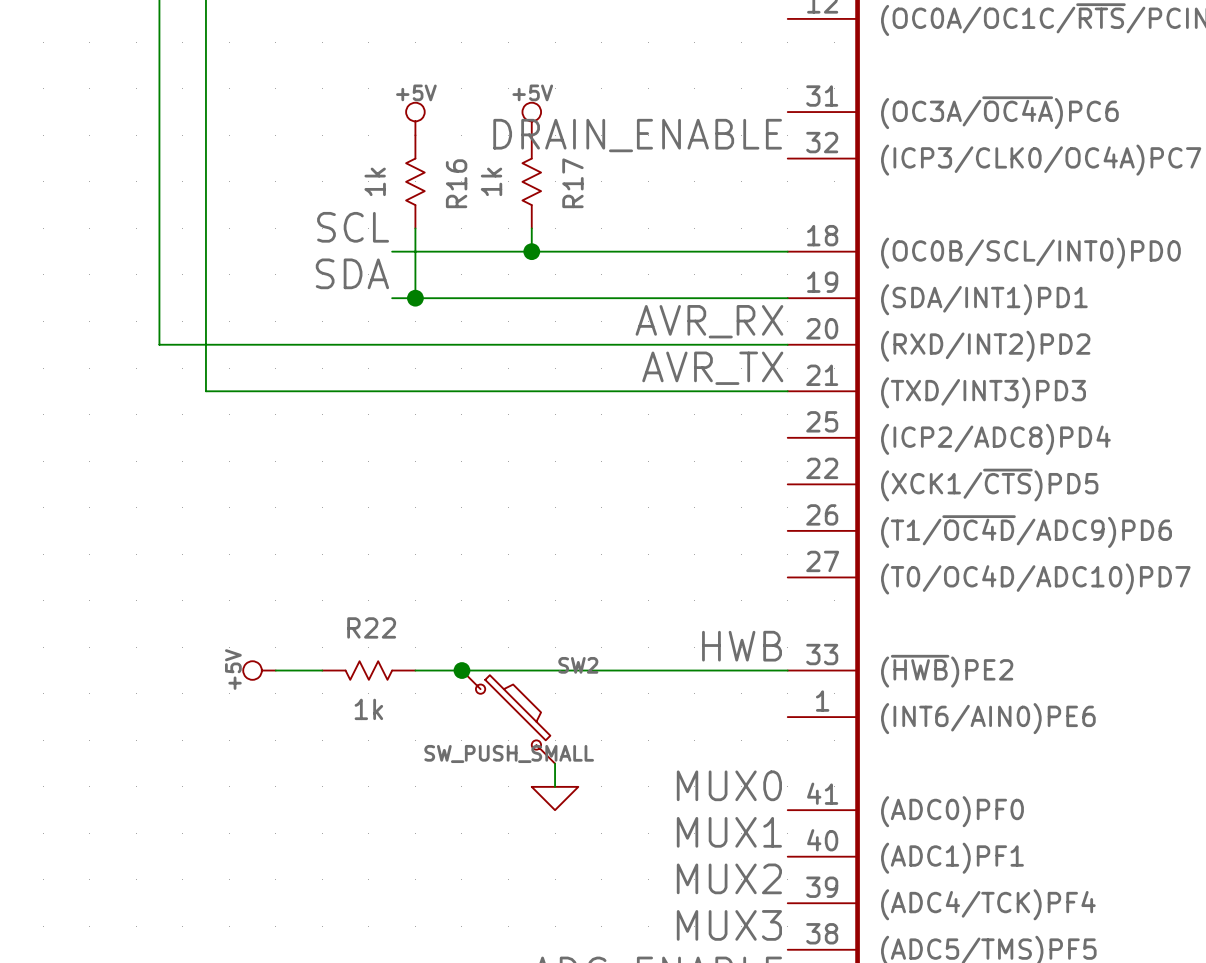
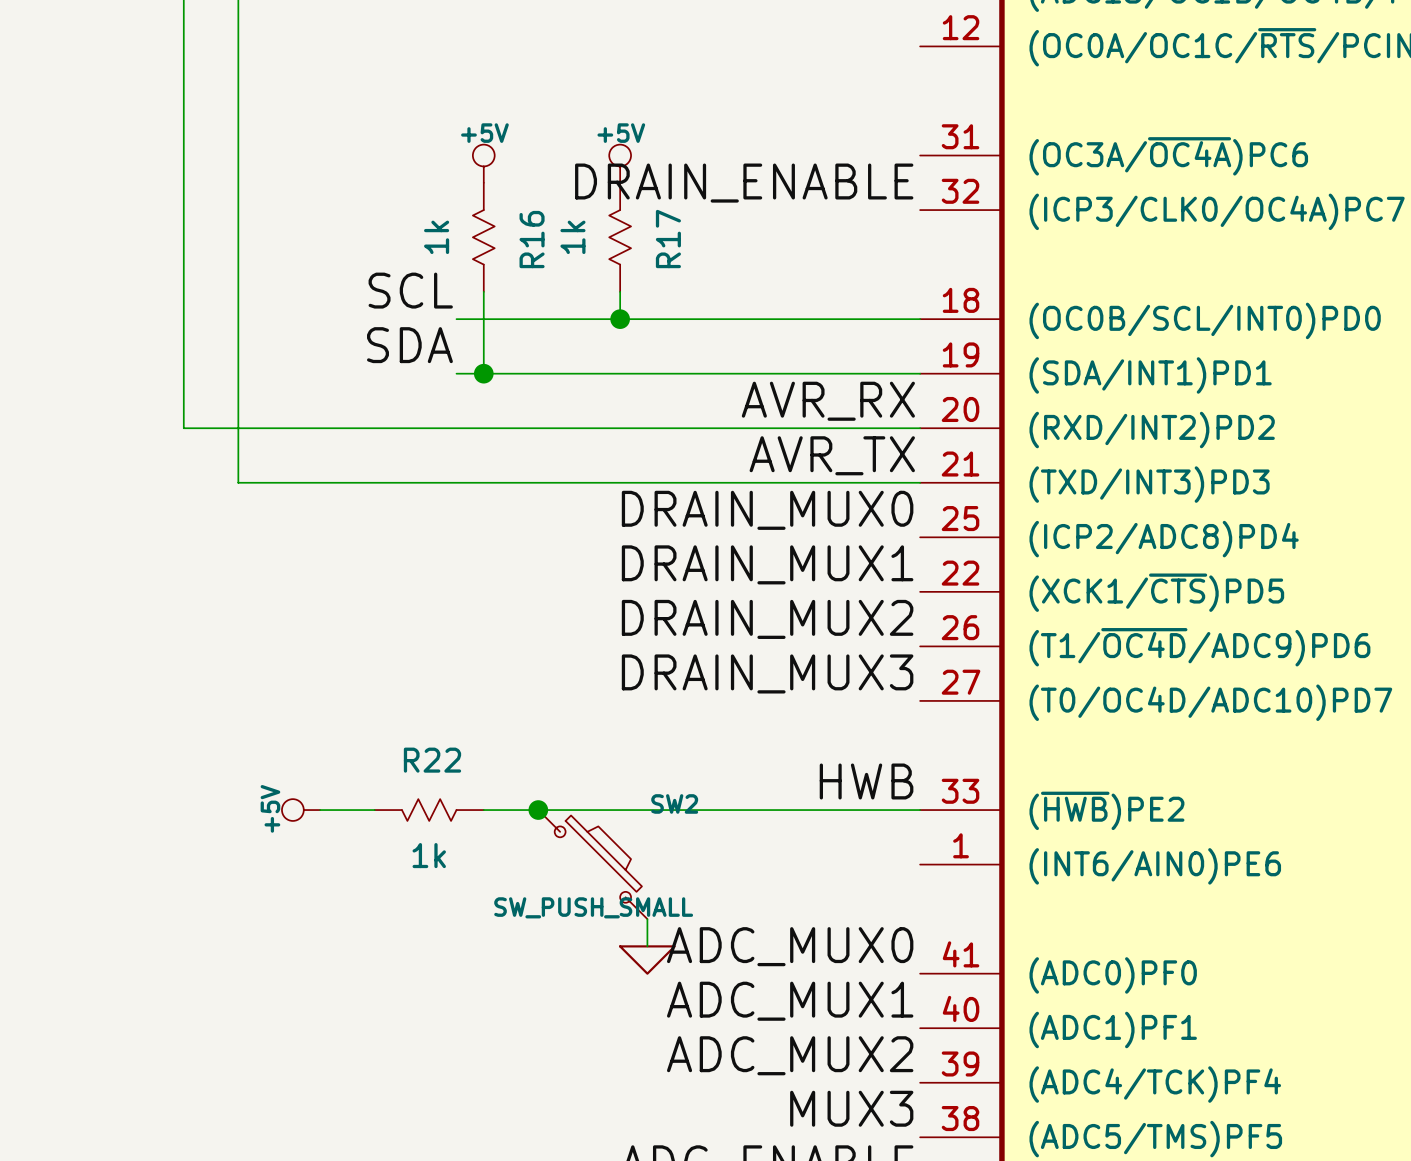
label: none -> DRAIN_MUX0 (767, 510)
label: none -> DRAIN_MUX1 (767, 564)
label: none -> DRAIN_MUX2 (767, 619)
label: none -> DRAIN_MUX3 (767, 673)
label: MUX0 (729, 785) -> ADC_MUX0 (790, 946)
label: MUX1 (729, 832) -> ADC_MUX1 (790, 1001)
label: MUX2 (729, 878) -> ADC_MUX2 (790, 1055)

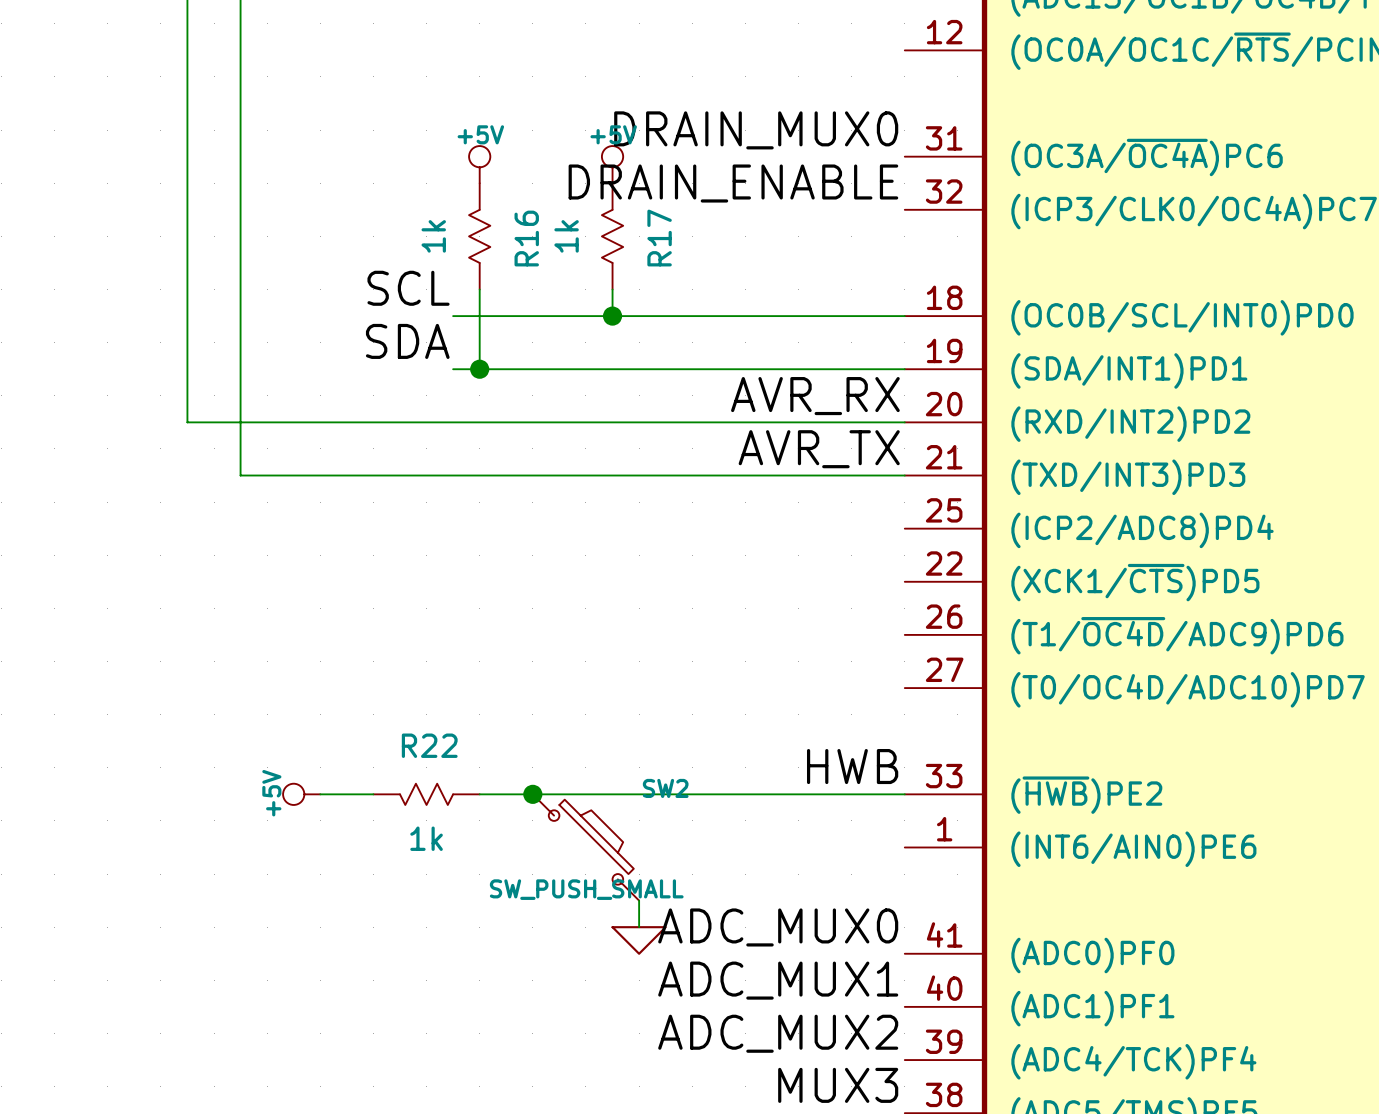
label position: DRAIN_MUX0 (767, 510) -> DRAIN_MUX0 (756, 130)
label: DRAIN_MUX1 (767, 564) -> none
label: DRAIN_MUX2 (767, 619) -> none
label: DRAIN_MUX3 (767, 673) -> none

